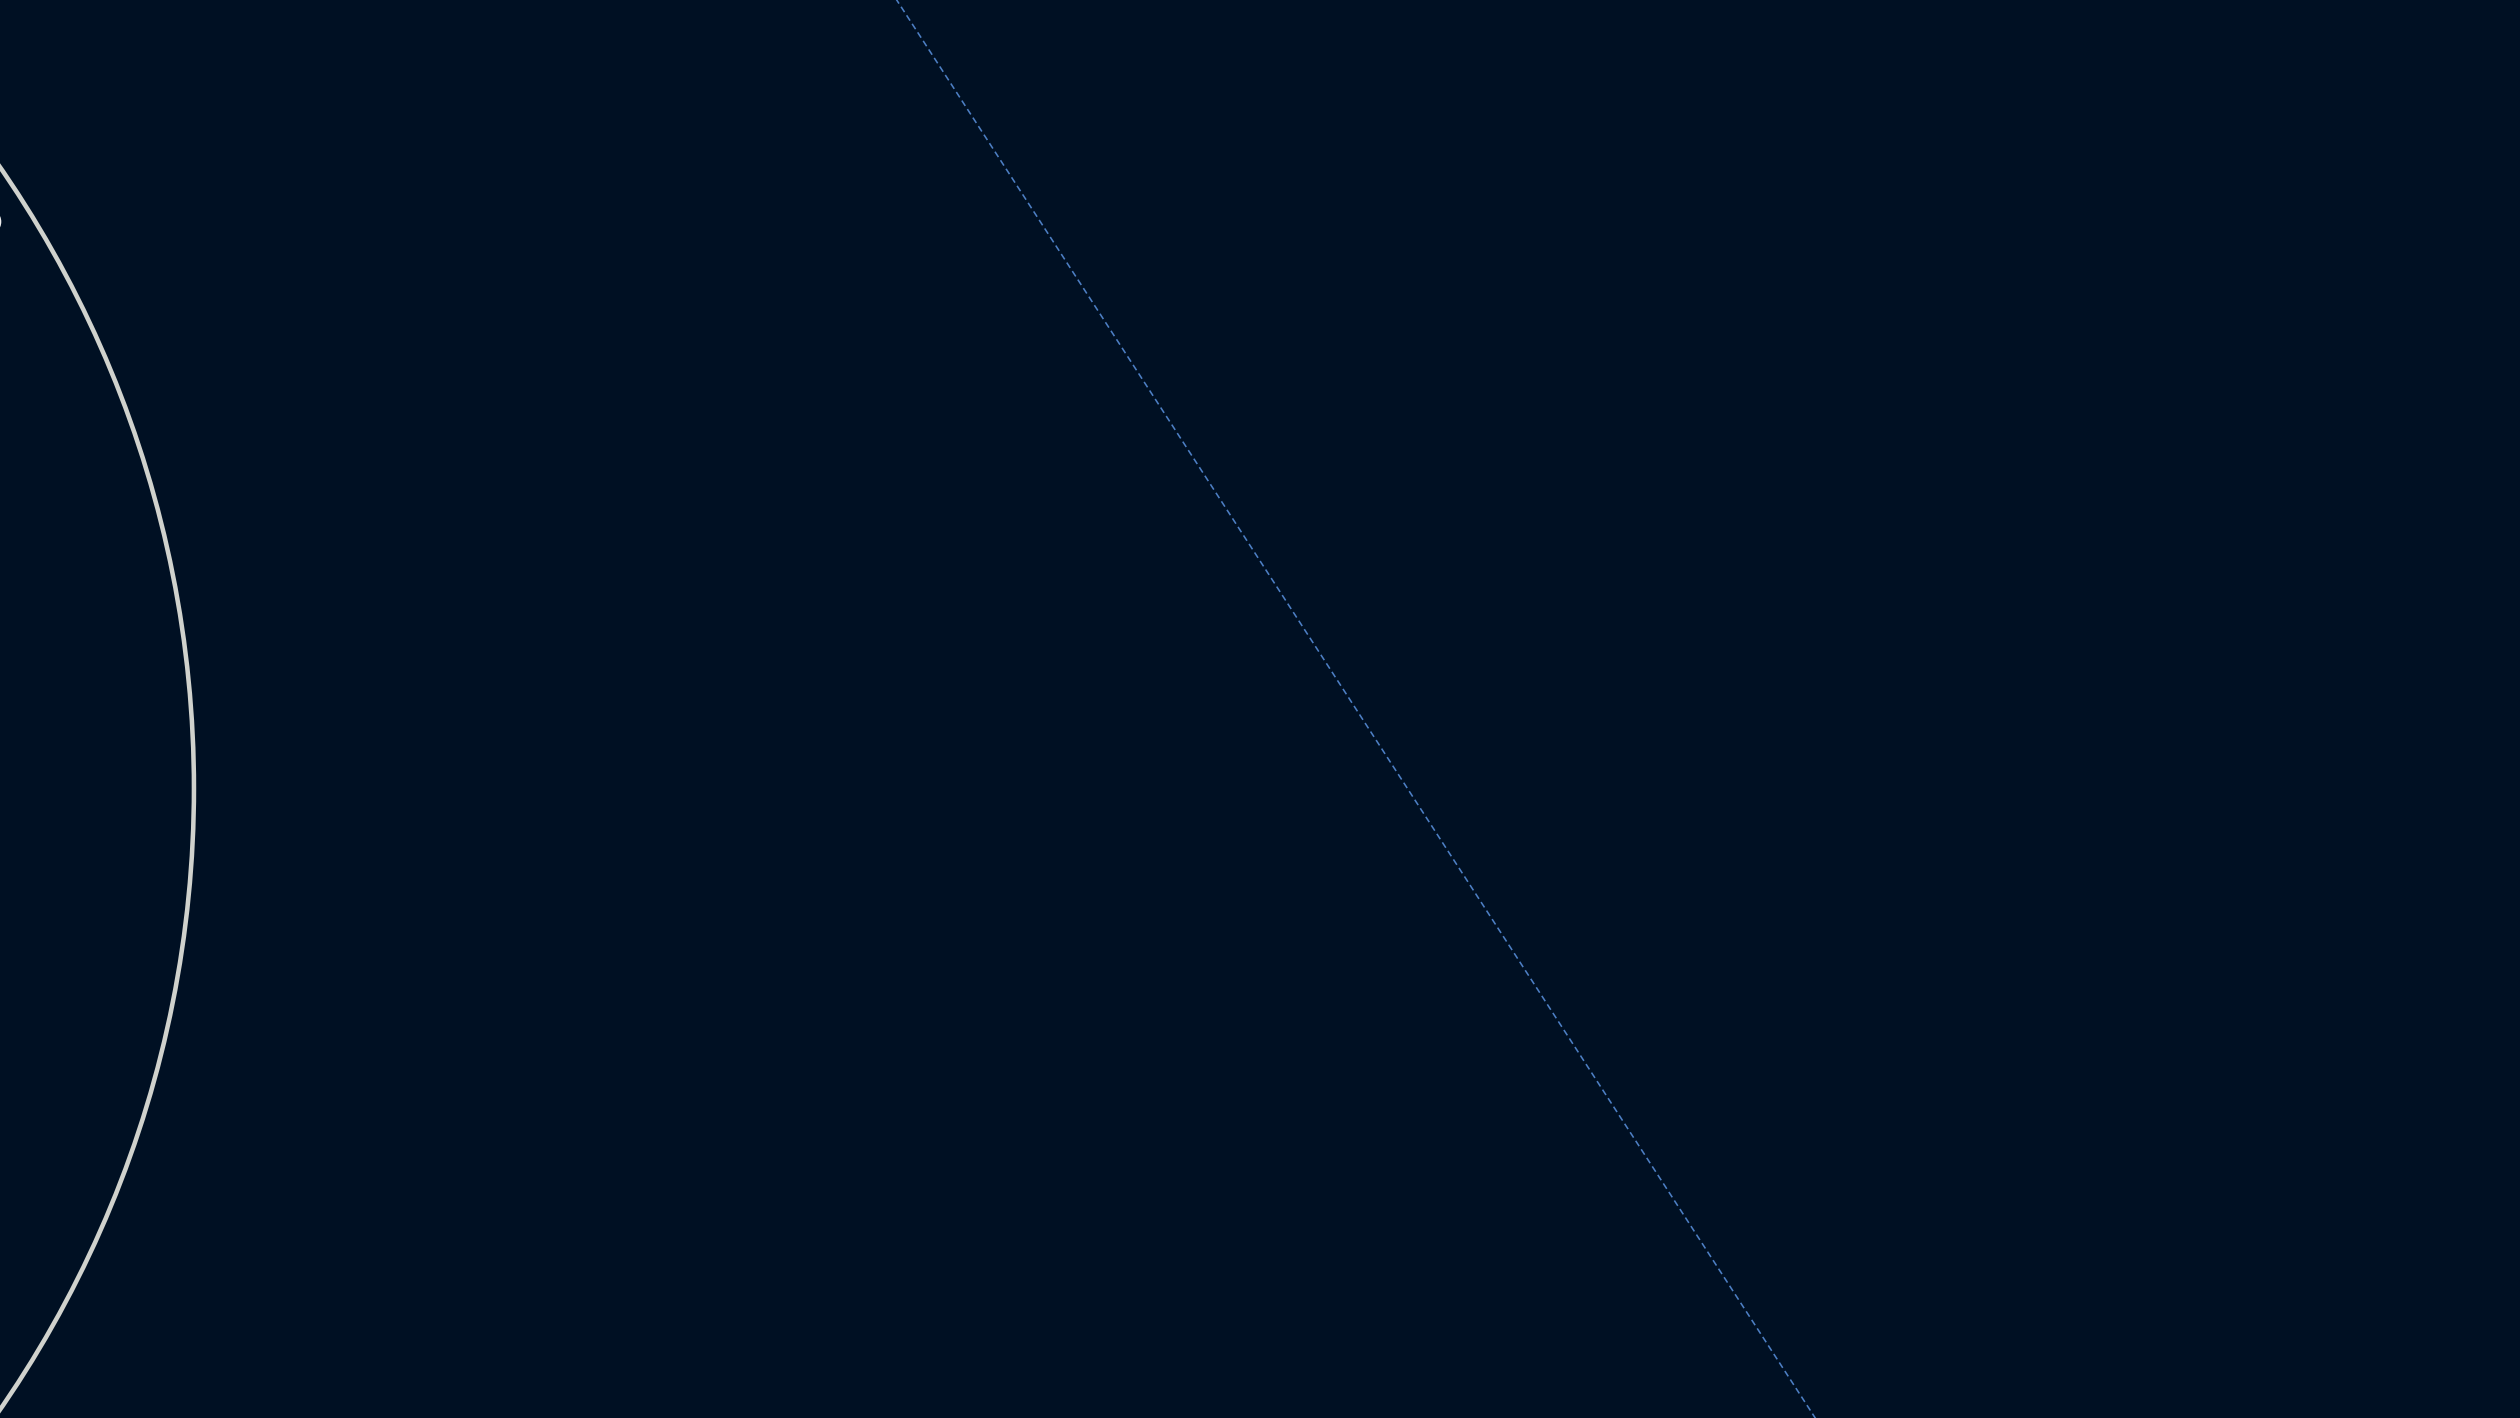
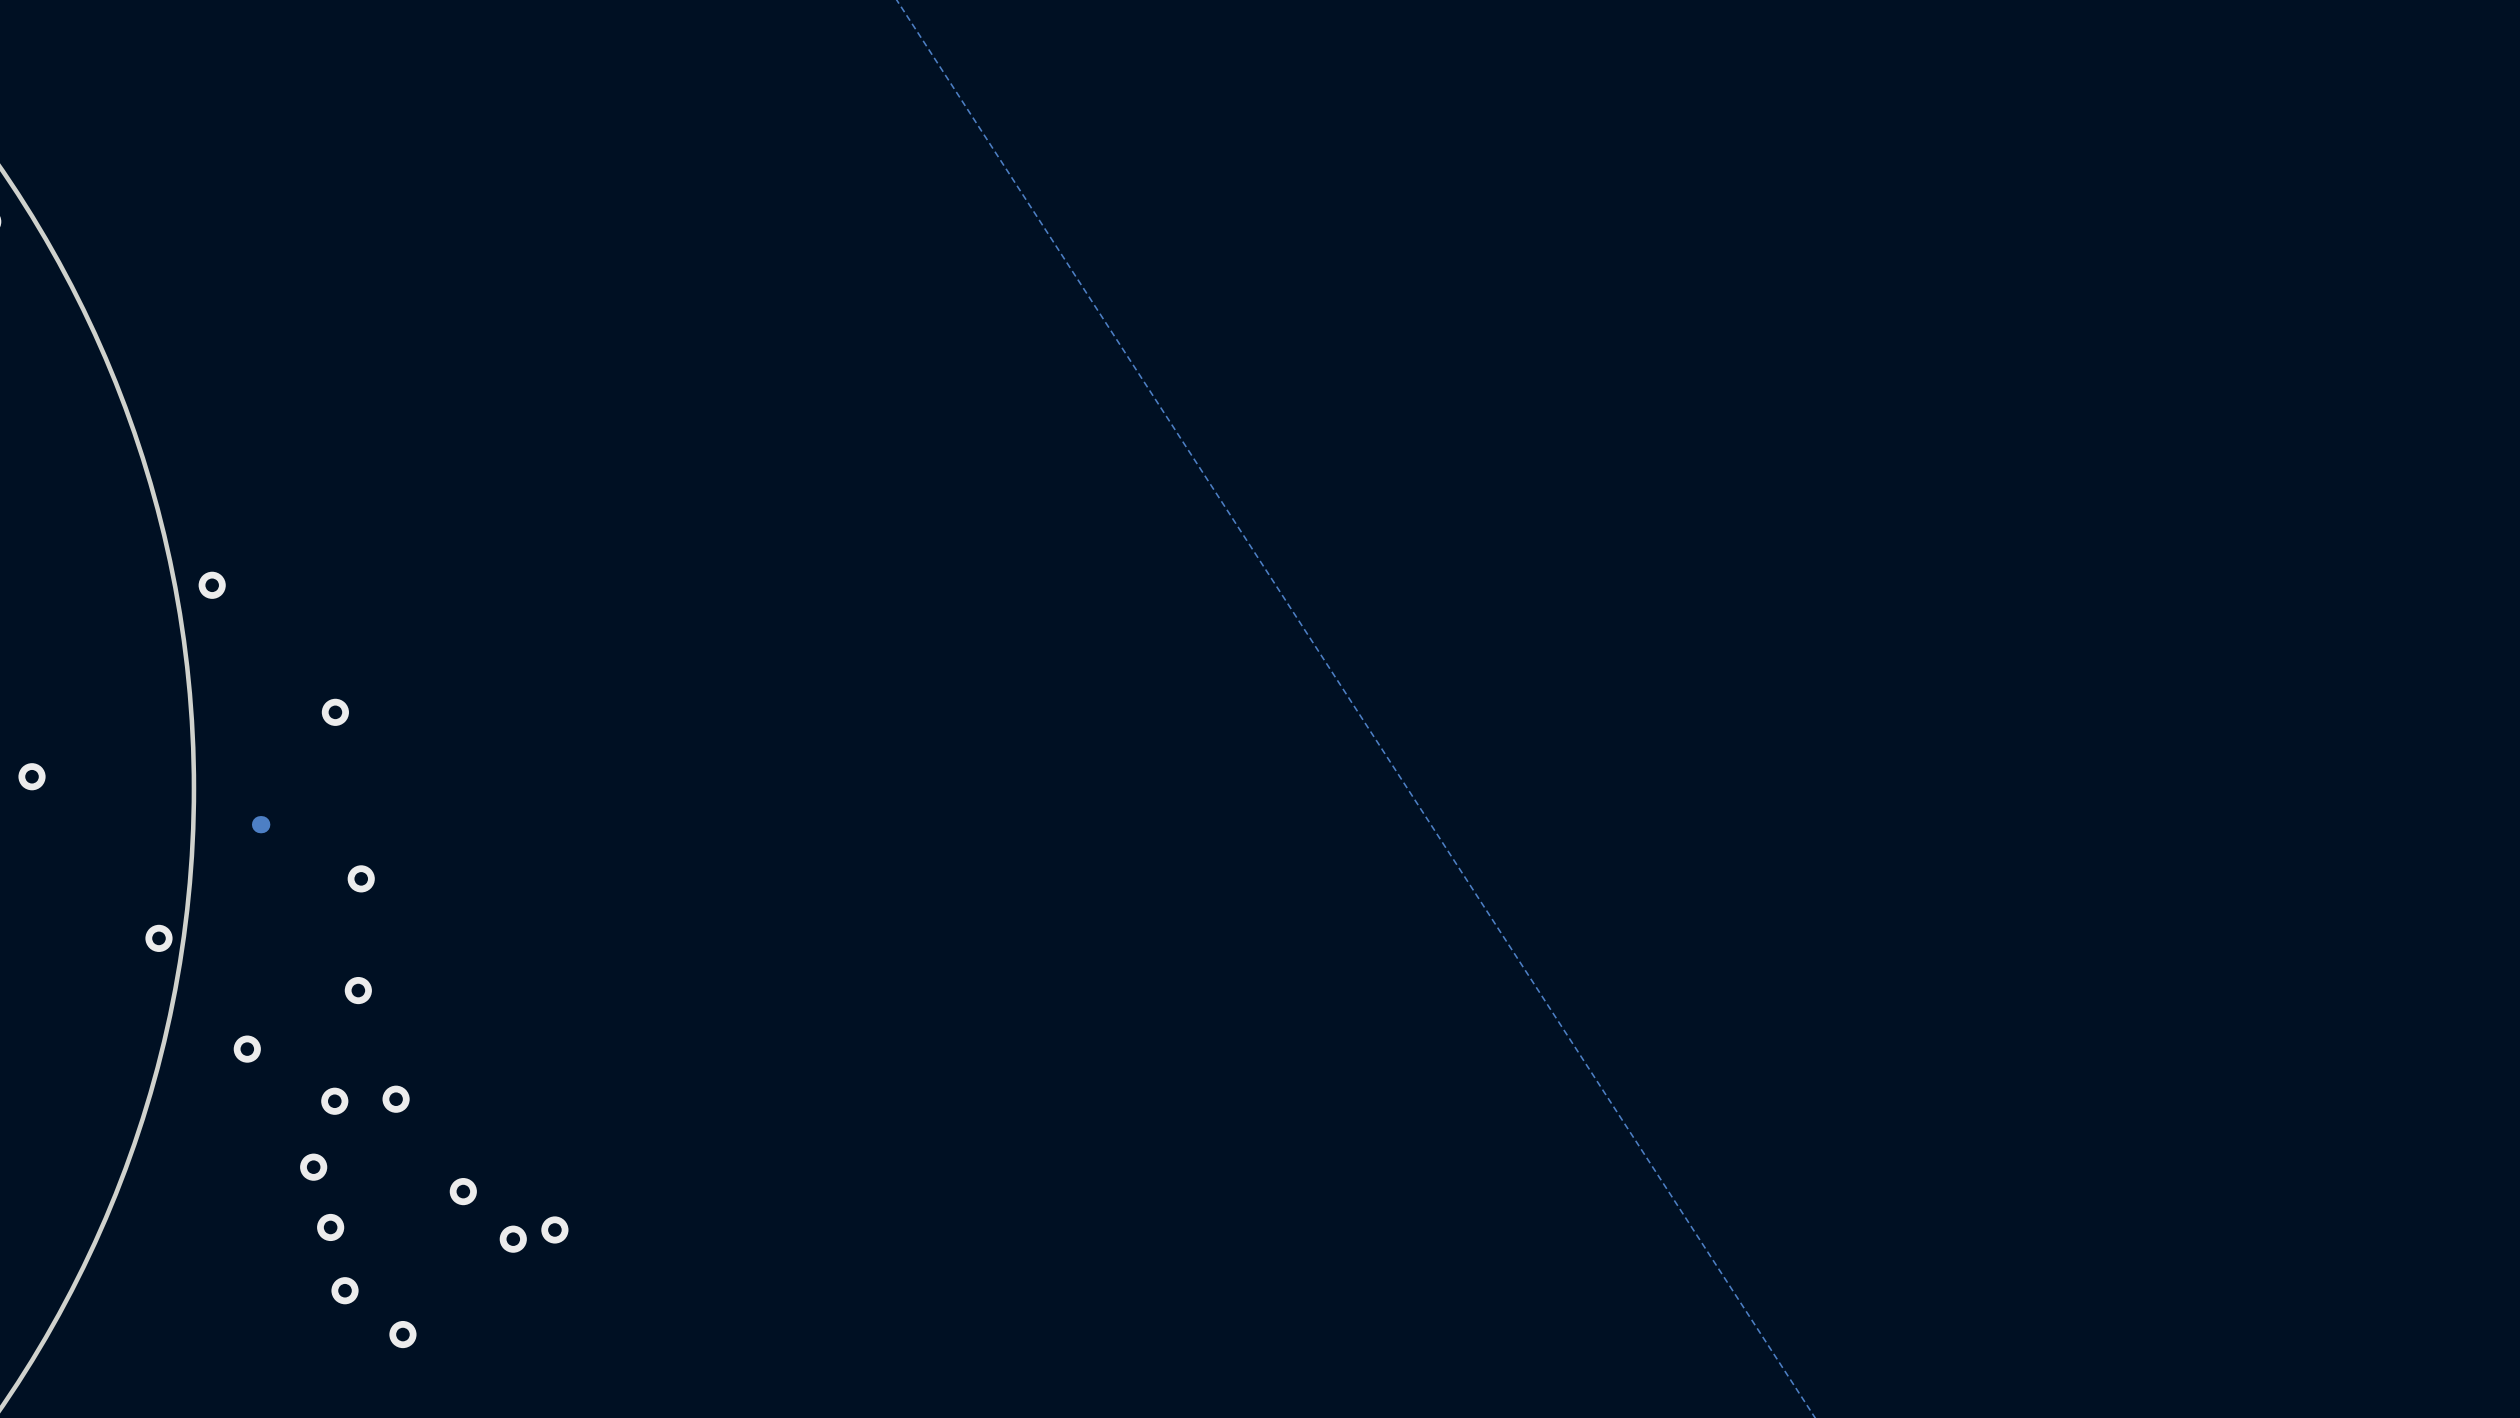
via: none -> (212, 585)
via: none -> (335, 712)
via: none -> (32, 776)
track: none -> (261, 824) (260, 824)
via: none -> (361, 878)
via: none -> (158, 938)
via: none -> (358, 990)
via: none -> (247, 1049)
via: none -> (396, 1099)
via: none -> (334, 1101)
via: none -> (313, 1167)
via: none -> (463, 1191)
via: none -> (330, 1227)
via: none -> (554, 1229)
via: none -> (513, 1239)
via: none -> (345, 1290)
via: none -> (402, 1334)

